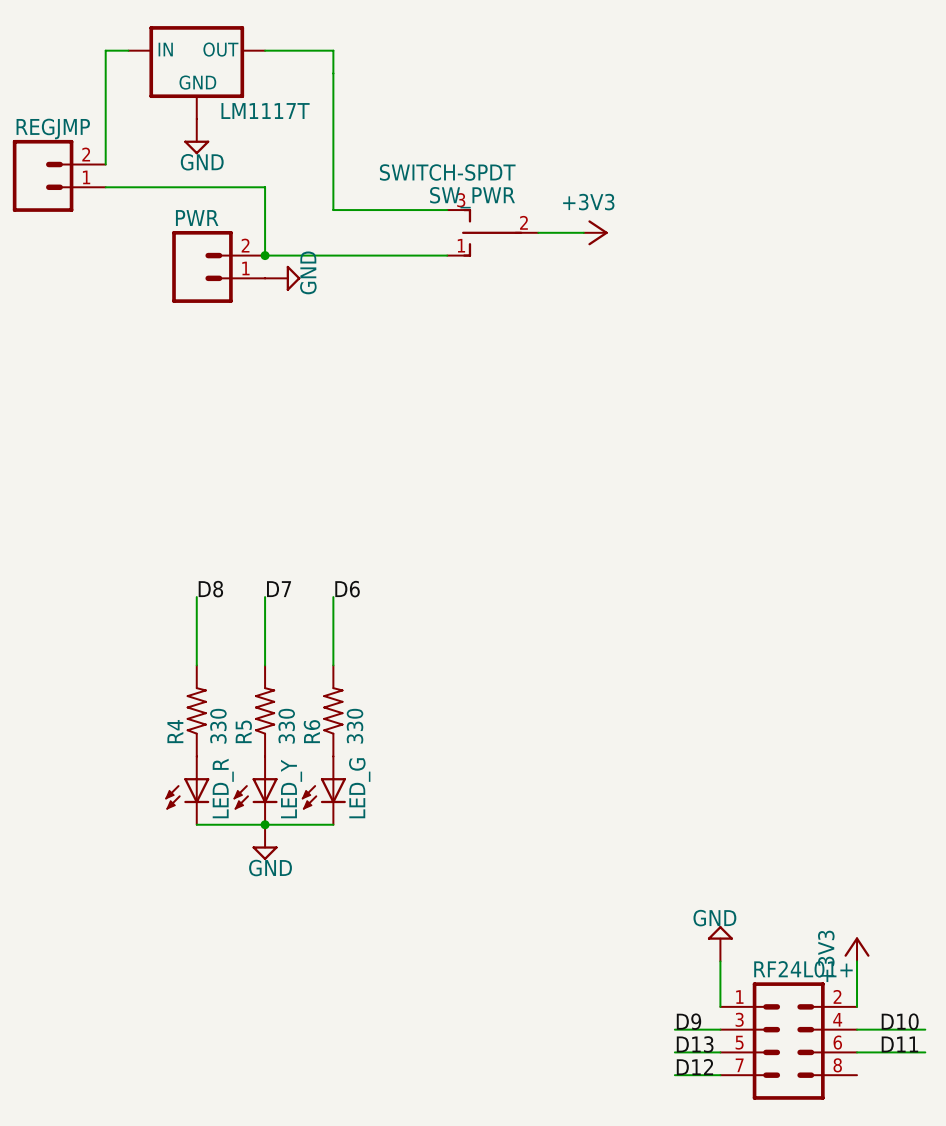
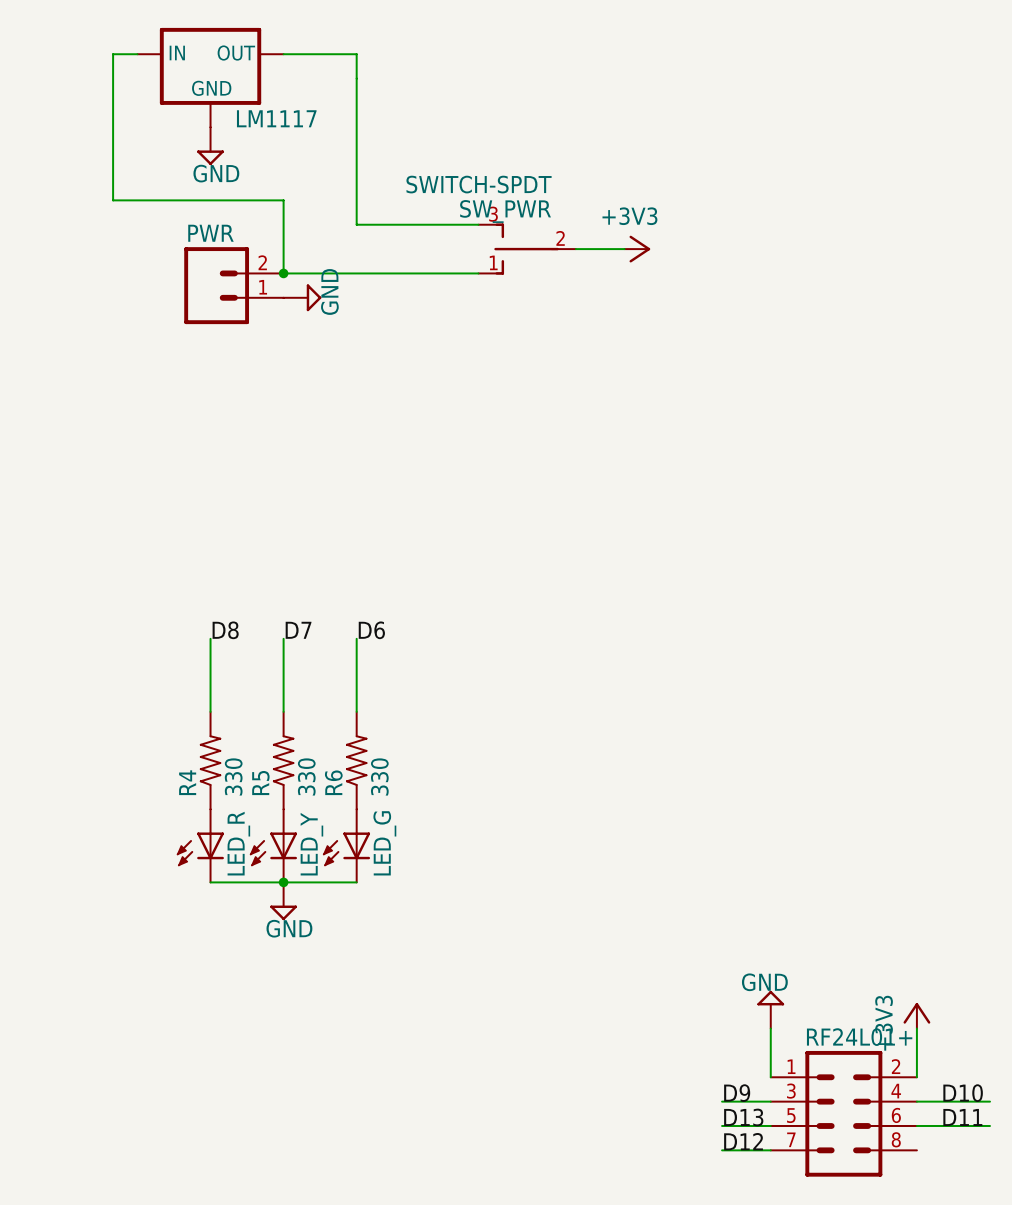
LM1117T name: LM1117T (265, 111) -> LM1117 (276, 118)
wire: none -> (113, 176) (113, 200)
REGJMP: (59, 175) -> none

